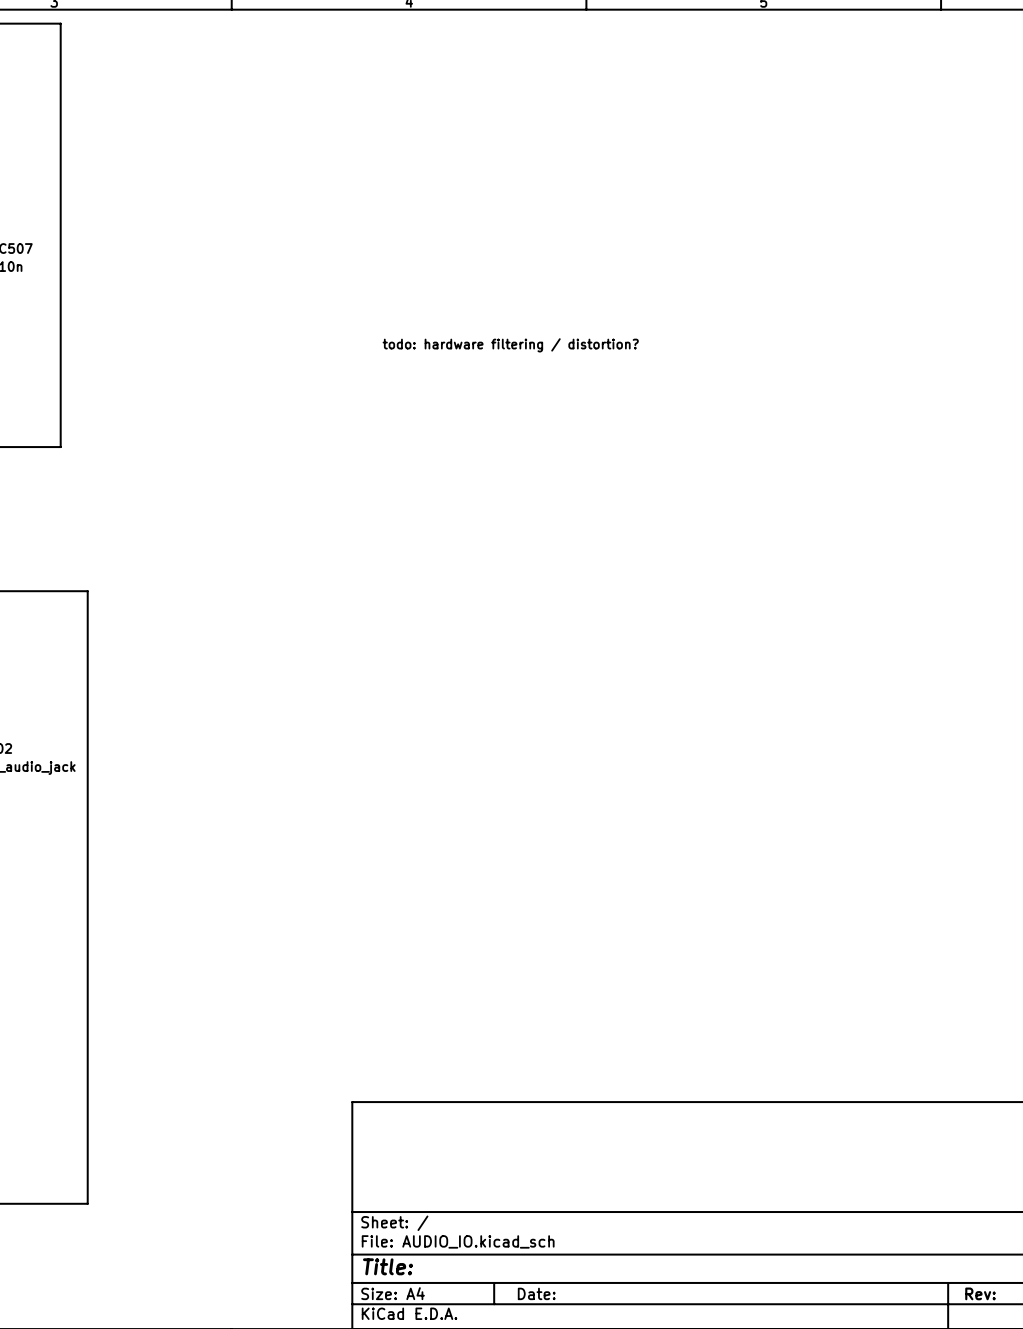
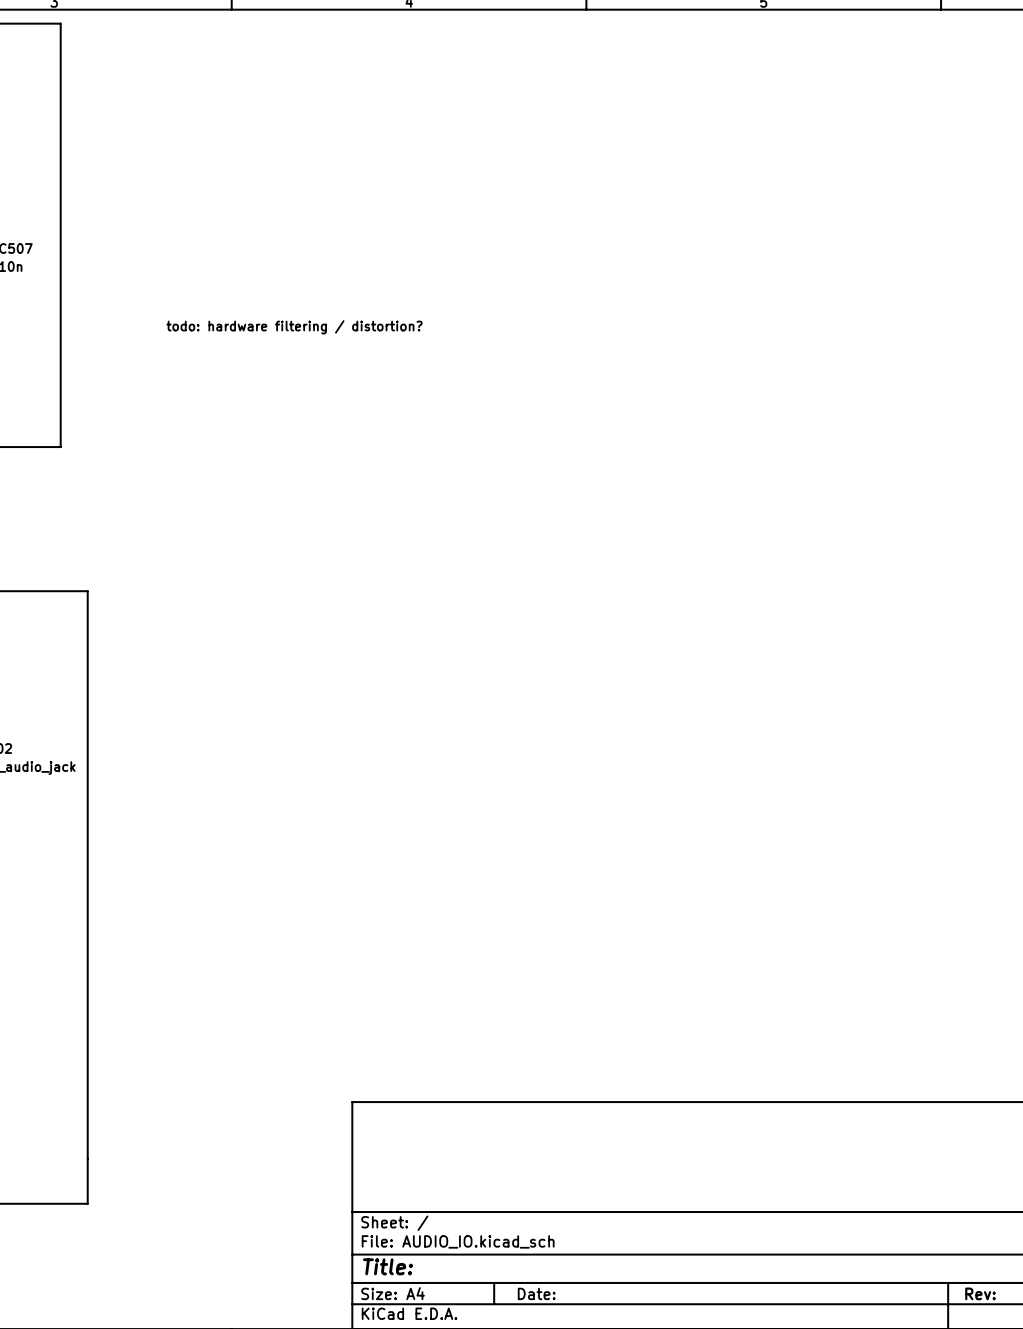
text: none -> todo: hardware filtering / distortion? (294, 327)
text: todo: hardware filtering / distortion? (510, 345) -> none

